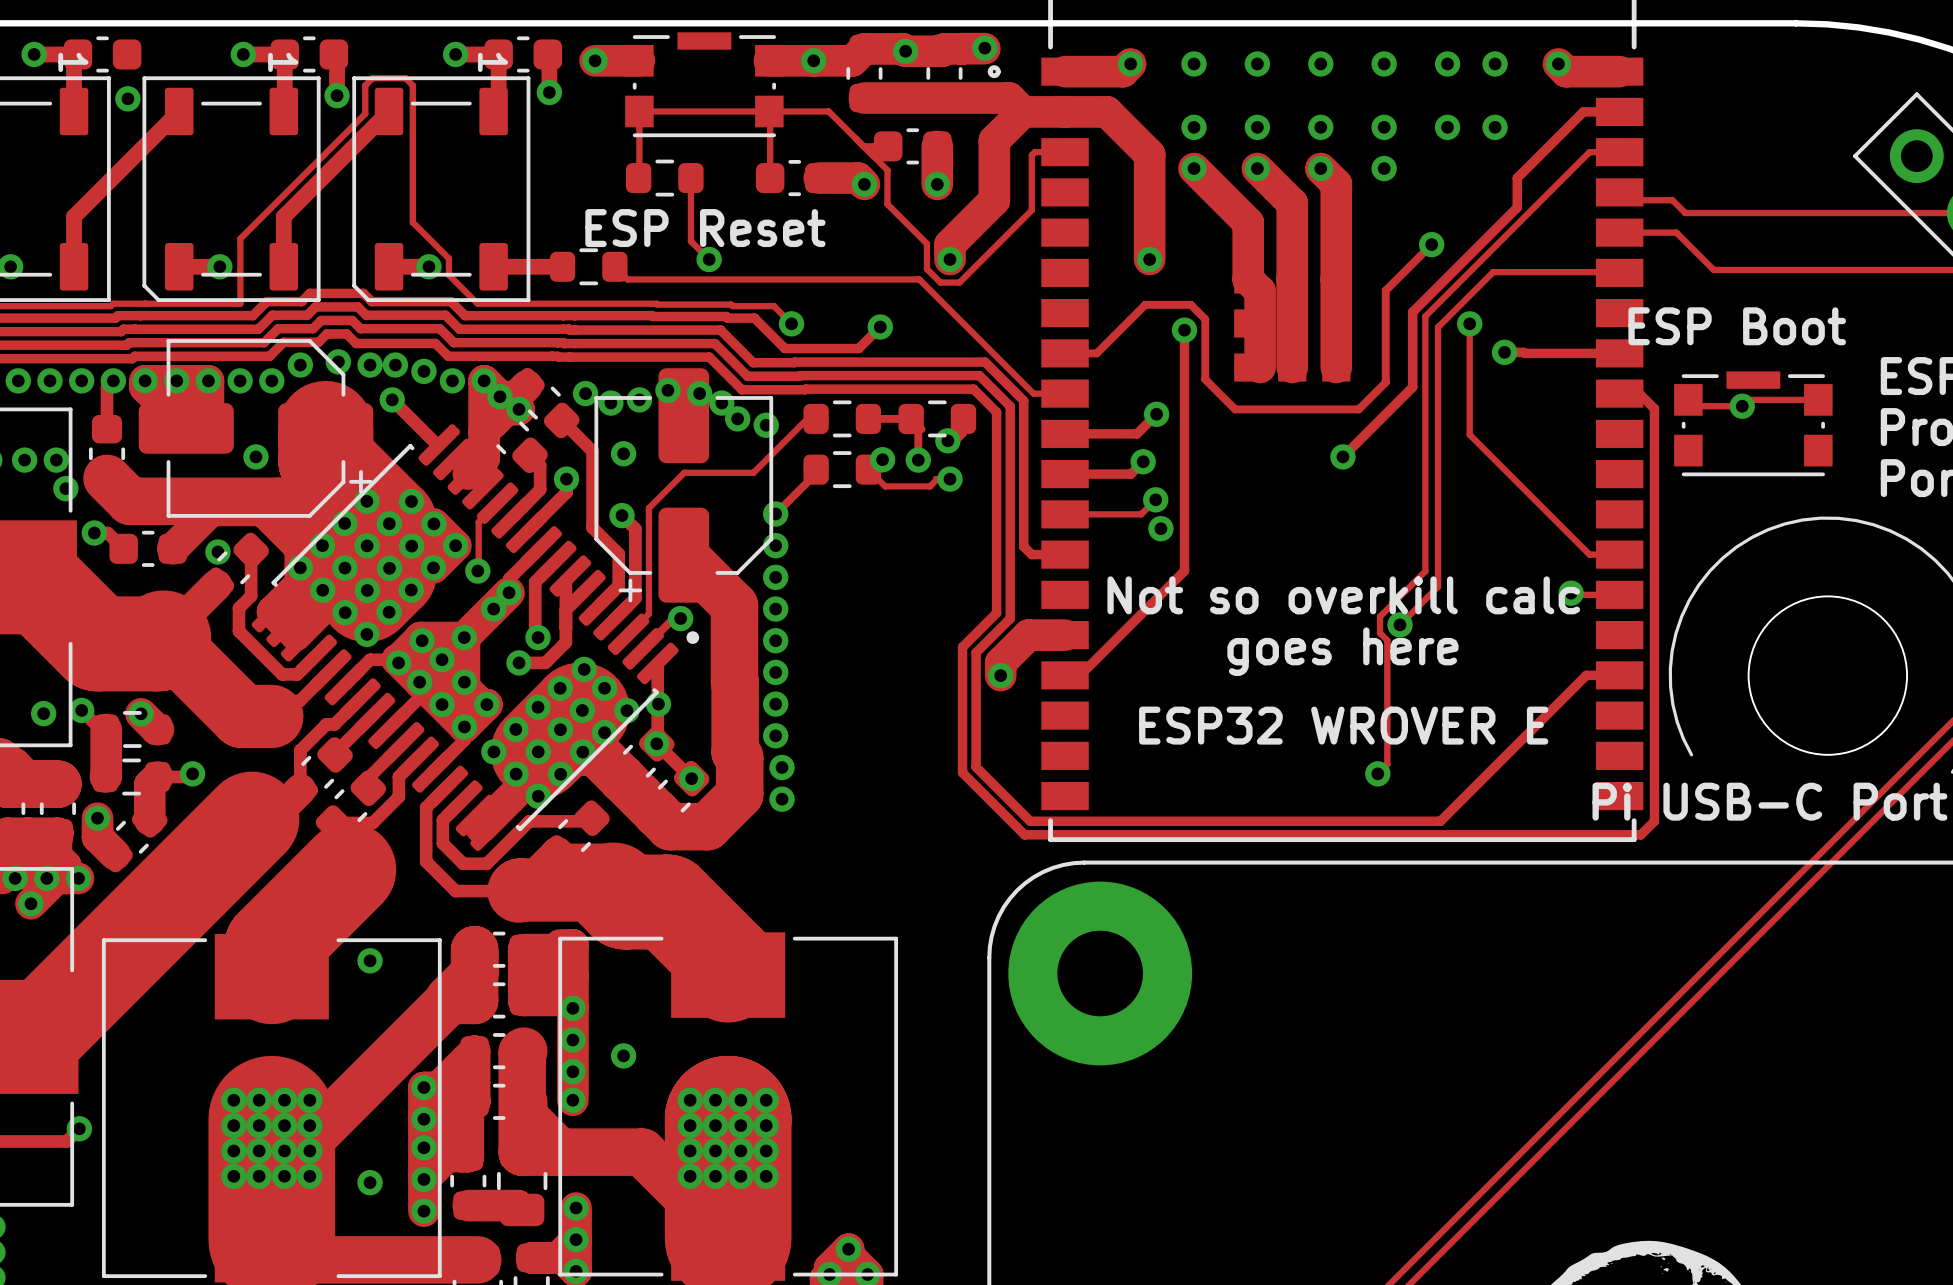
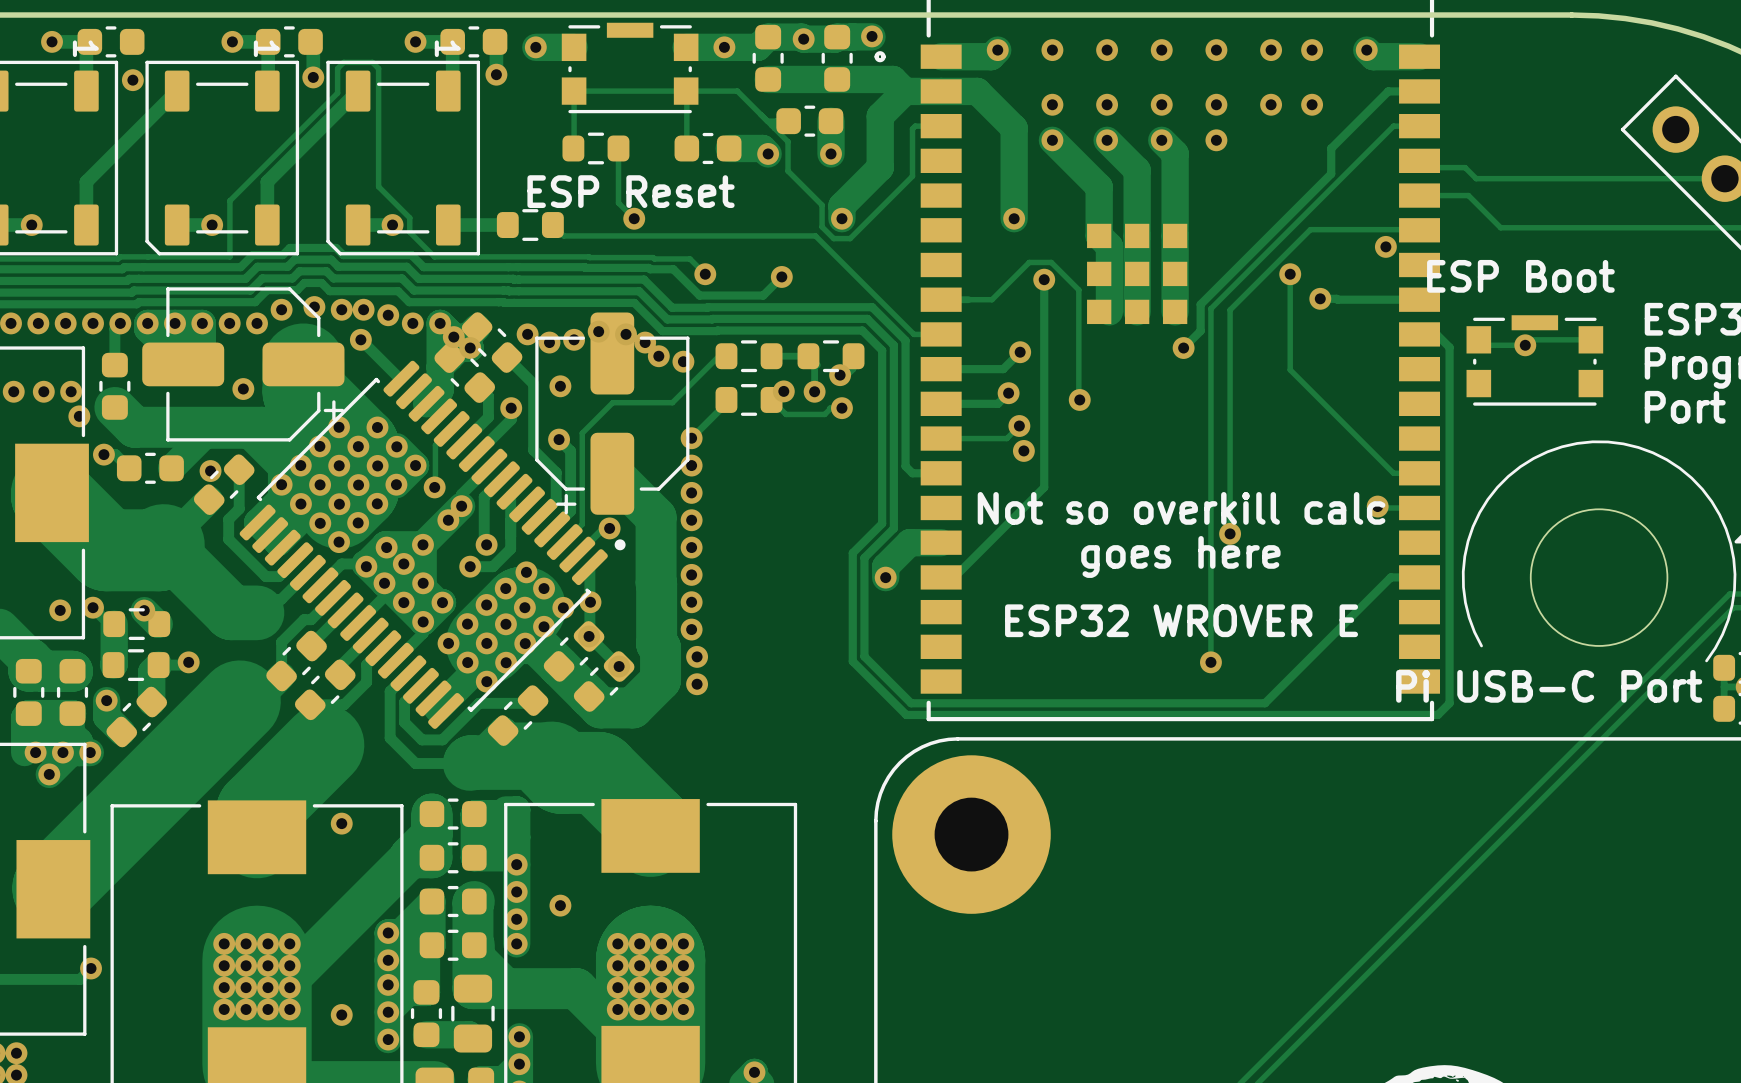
track: (1431, 244) (1385, 290) (1385, 382) (1358, 409) (1235, 409) (1205, 379) (1205, 319) (1190, 304) (1145, 304) (1096, 353) -> (1079, 399) (1078, 289) (1051, 262) (1029, 262) (992, 299) (968, 299)
via: (1431, 244) -> none
via: none -> (1385, 246)
track: (1412, 312) (1412, 387) (1342, 456) -> (1241, 264) (1200, 304) (1200, 330) (1183, 348)
track: (1425, 316) (1425, 571) (1380, 616) (1380, 633) (1387, 640) (1387, 764) (1377, 773) -> (1251, 267) (1210, 308) (1210, 662)
track: (1438, 327) (1438, 586) (1400, 624) -> (1262, 277) (1230, 310) (1230, 533)
via position: (1342, 456) -> (1183, 348)
via: none -> (1079, 399)

